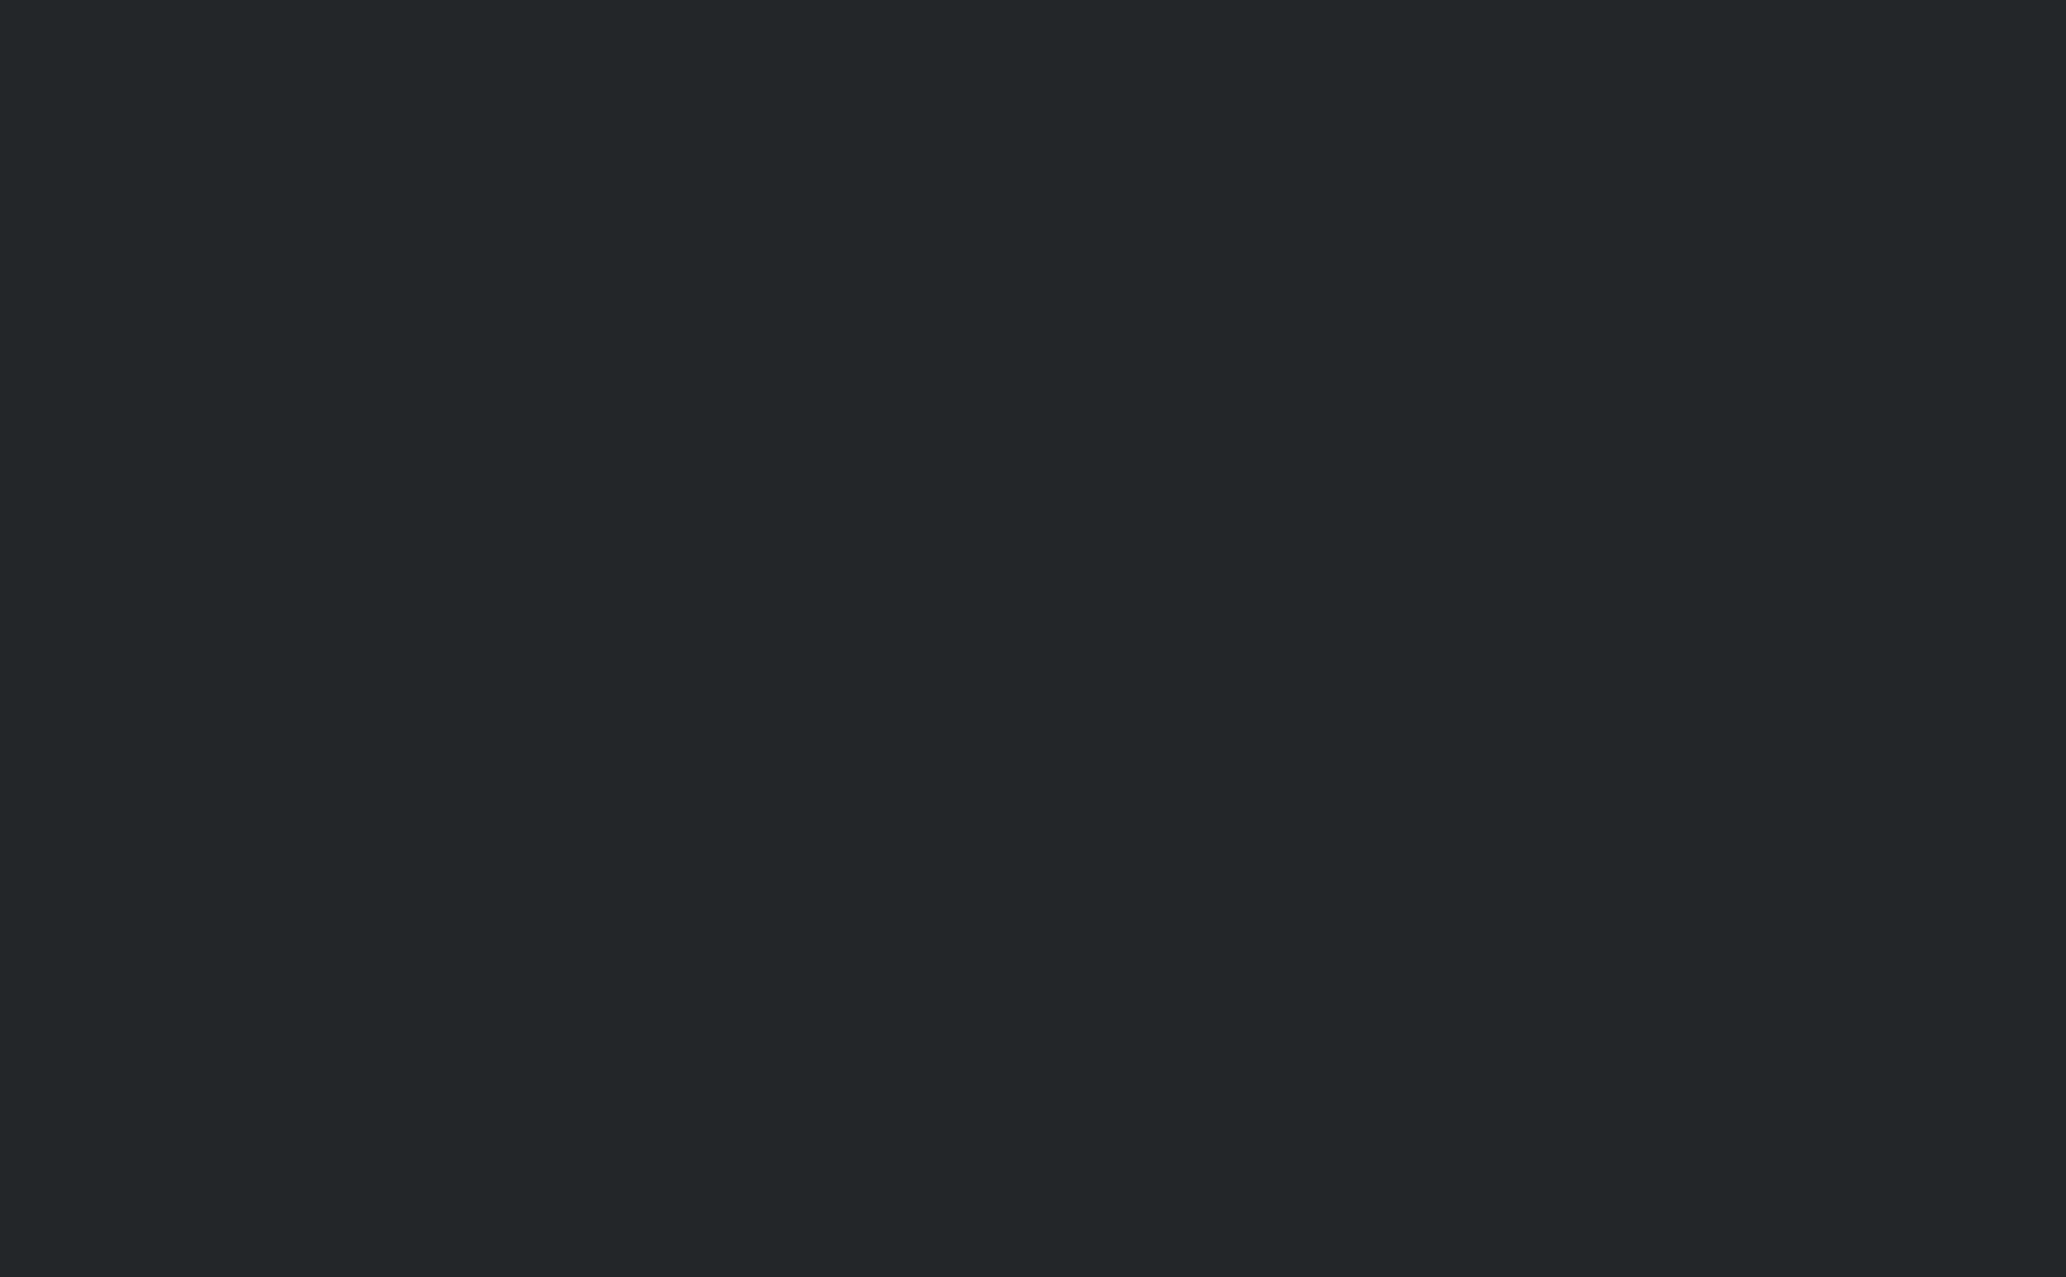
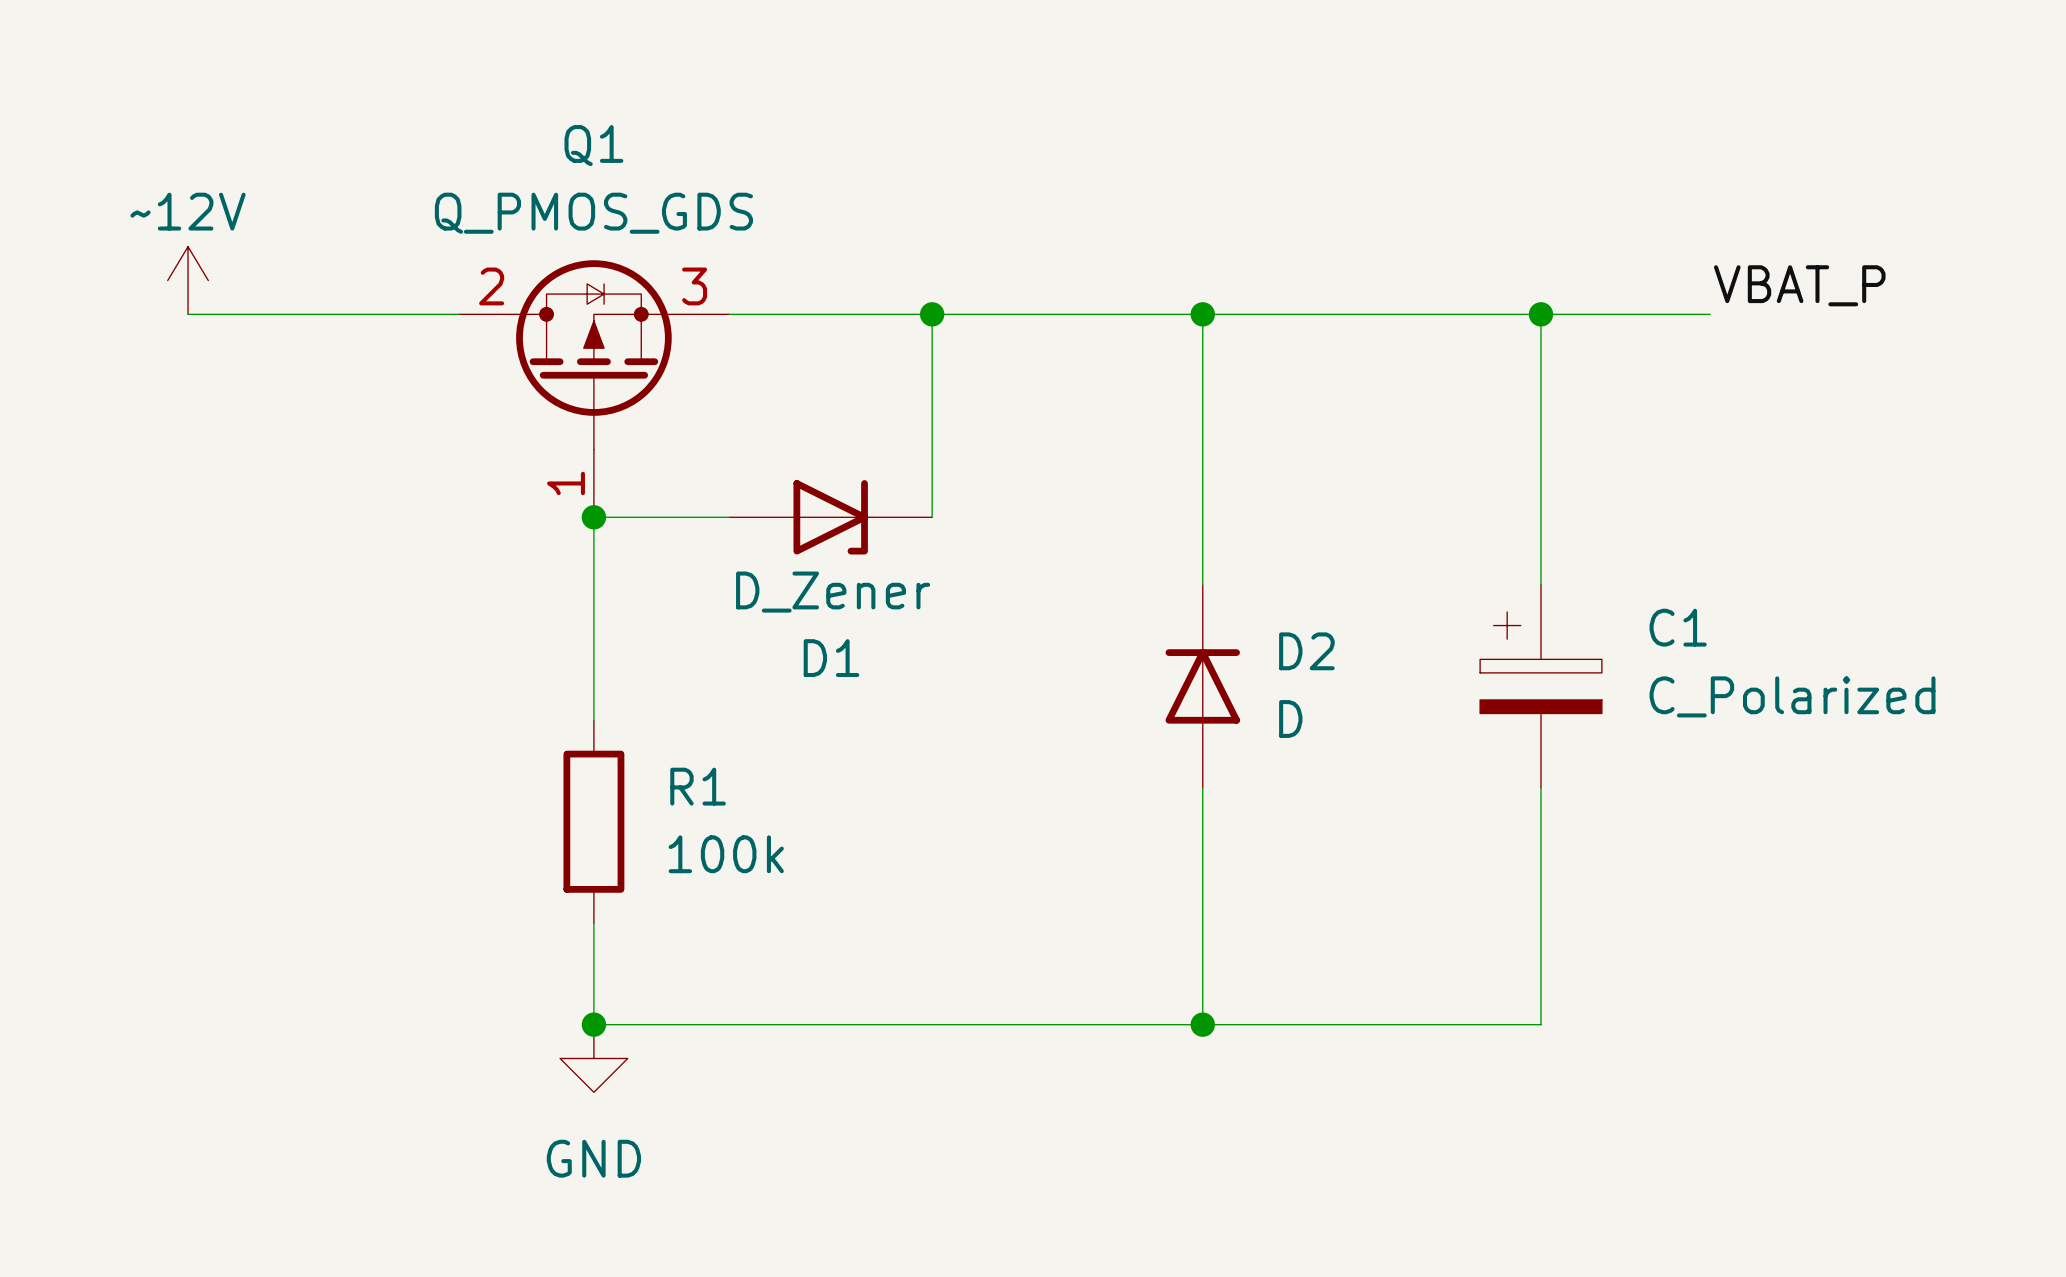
power symbol: none -> ~12V (188, 280)
label: none -> VBAT_P (1799, 285)
wire: none -> (188, 314) (458, 314)
wire: none -> (729, 314) (1710, 314)
wire: none -> (932, 314) (932, 517)
junction: none -> (932, 314)
wire: none -> (1202, 314) (1202, 584)
junction: none -> (1202, 314)
wire: none -> (1541, 314) (1541, 584)
junction: none -> (1541, 314)
Q1: none -> Q_PMOS_GDS (593, 388)
junction: none -> (593, 517)
wire: none -> (729, 517) (593, 517) (593, 720)
D1: none -> D_Zener (830, 517)
D2: none -> D (1202, 686)
C1: none -> C_Polarized (1541, 686)
wire: none -> (1202, 787) (1202, 1024)
wire: none -> (1541, 787) (1541, 1024) (593, 1024) (593, 923)
R1: none -> 100k (593, 821)
junction: none -> (593, 1024)
junction: none -> (1202, 1024)
power symbol: none -> GND (593, 1058)

